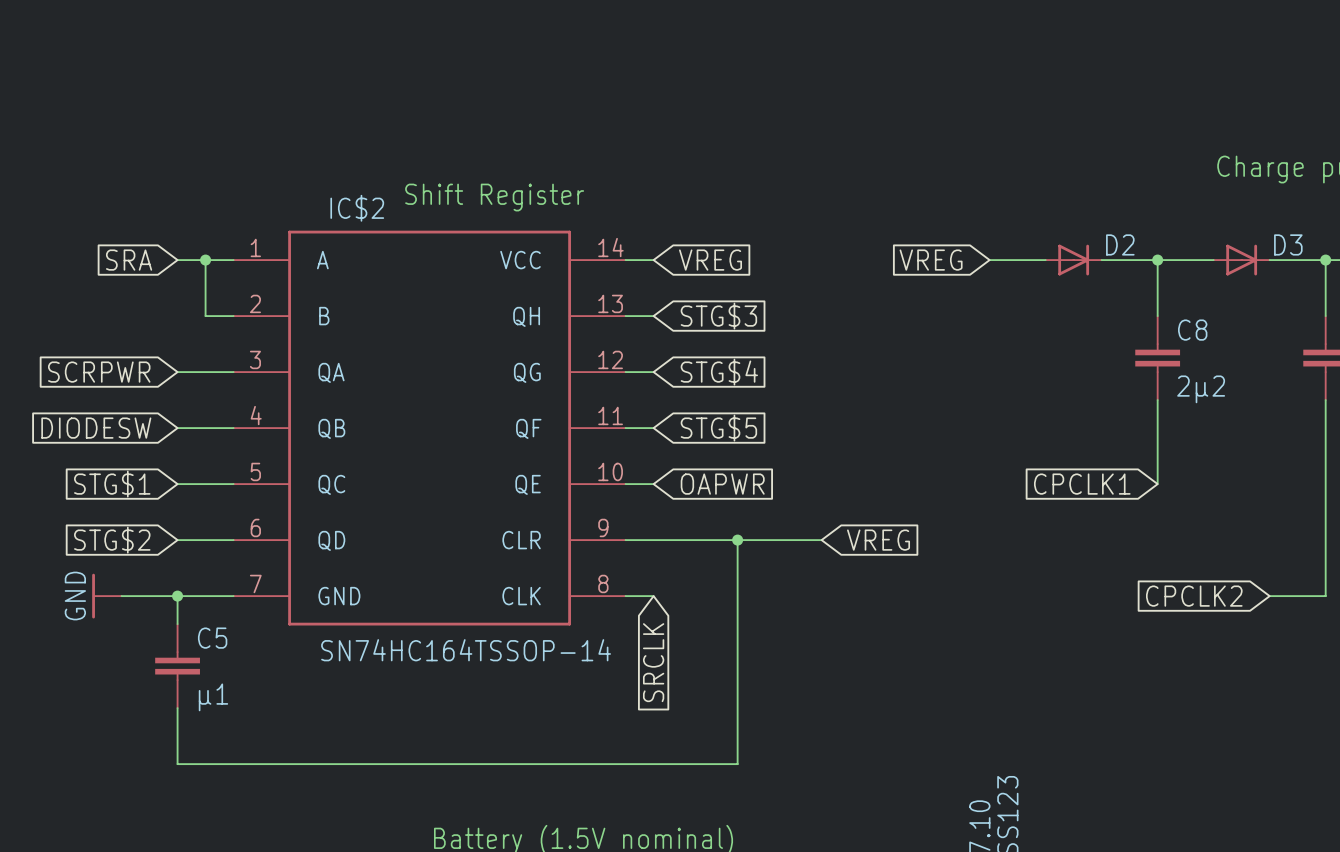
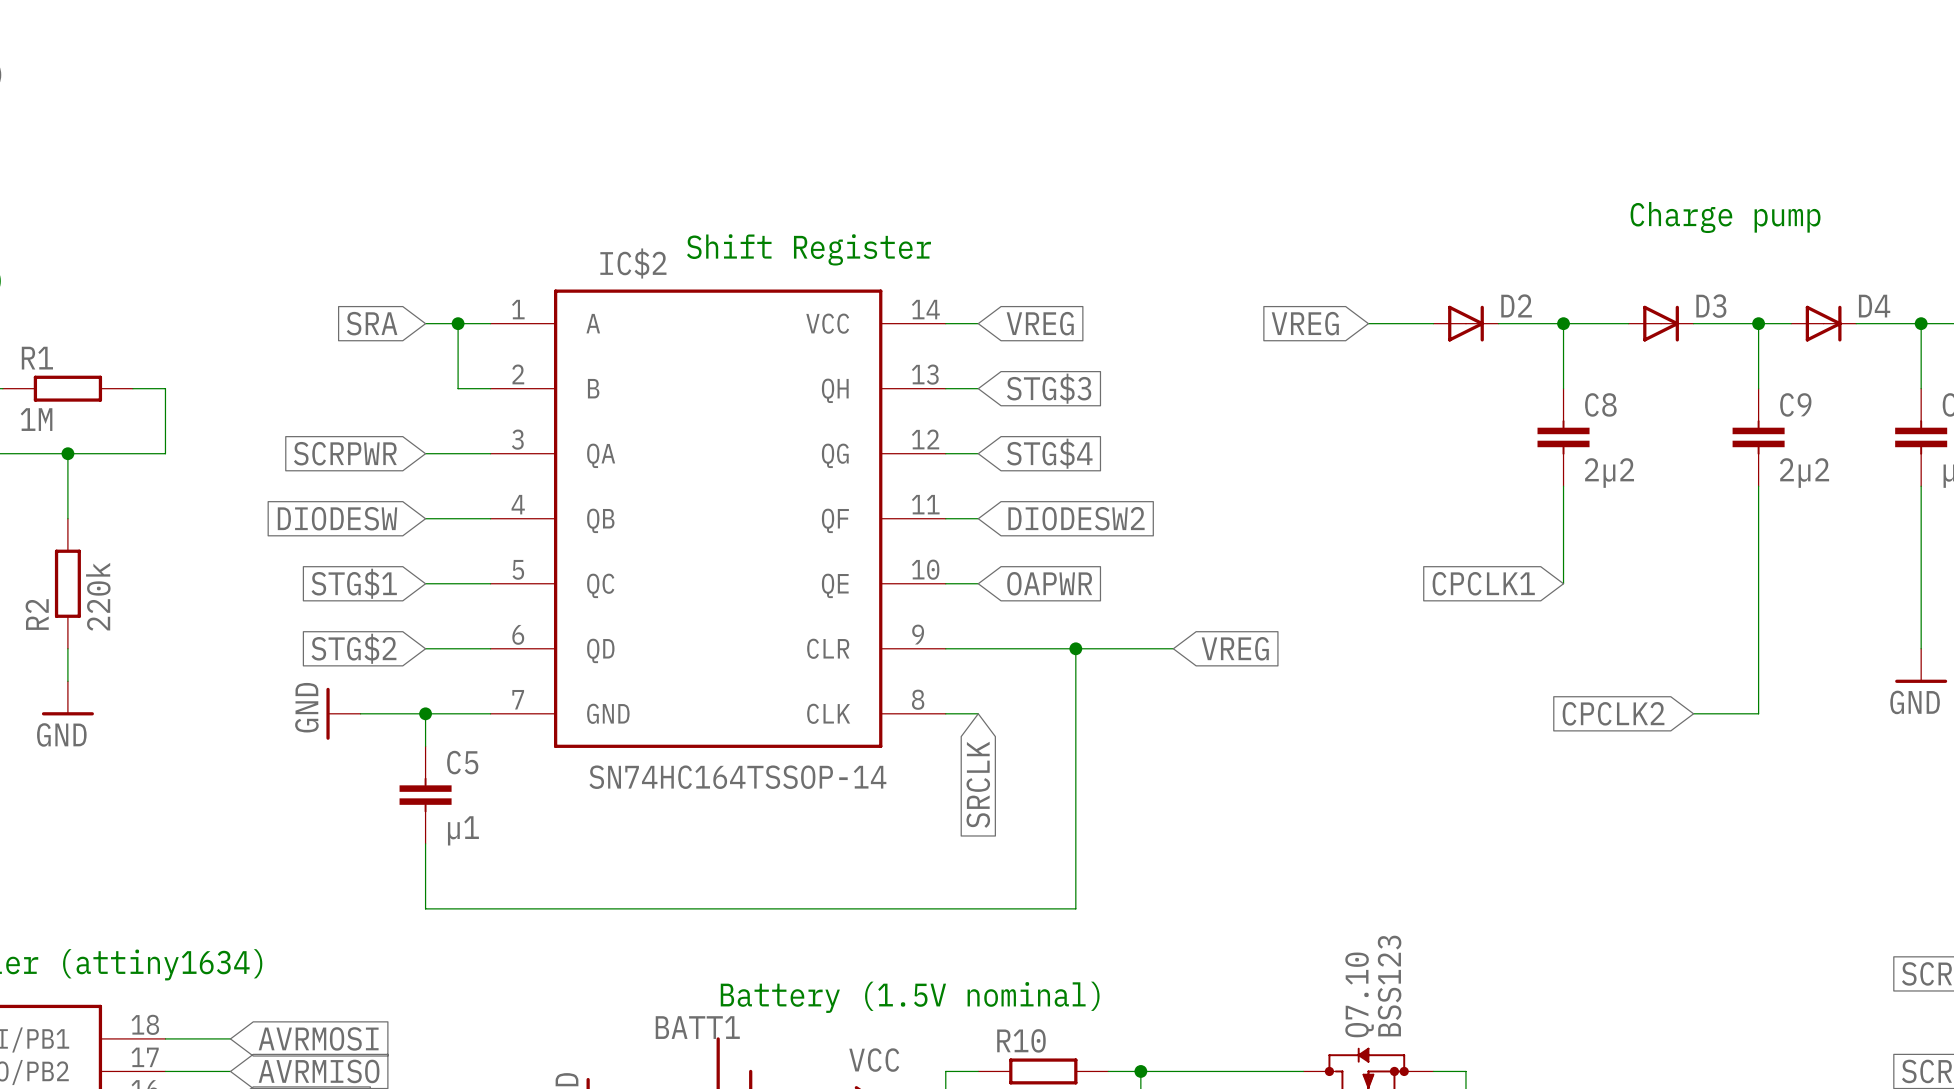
global label: STG$5 (718, 428) -> DIODESW2 (1076, 518)

